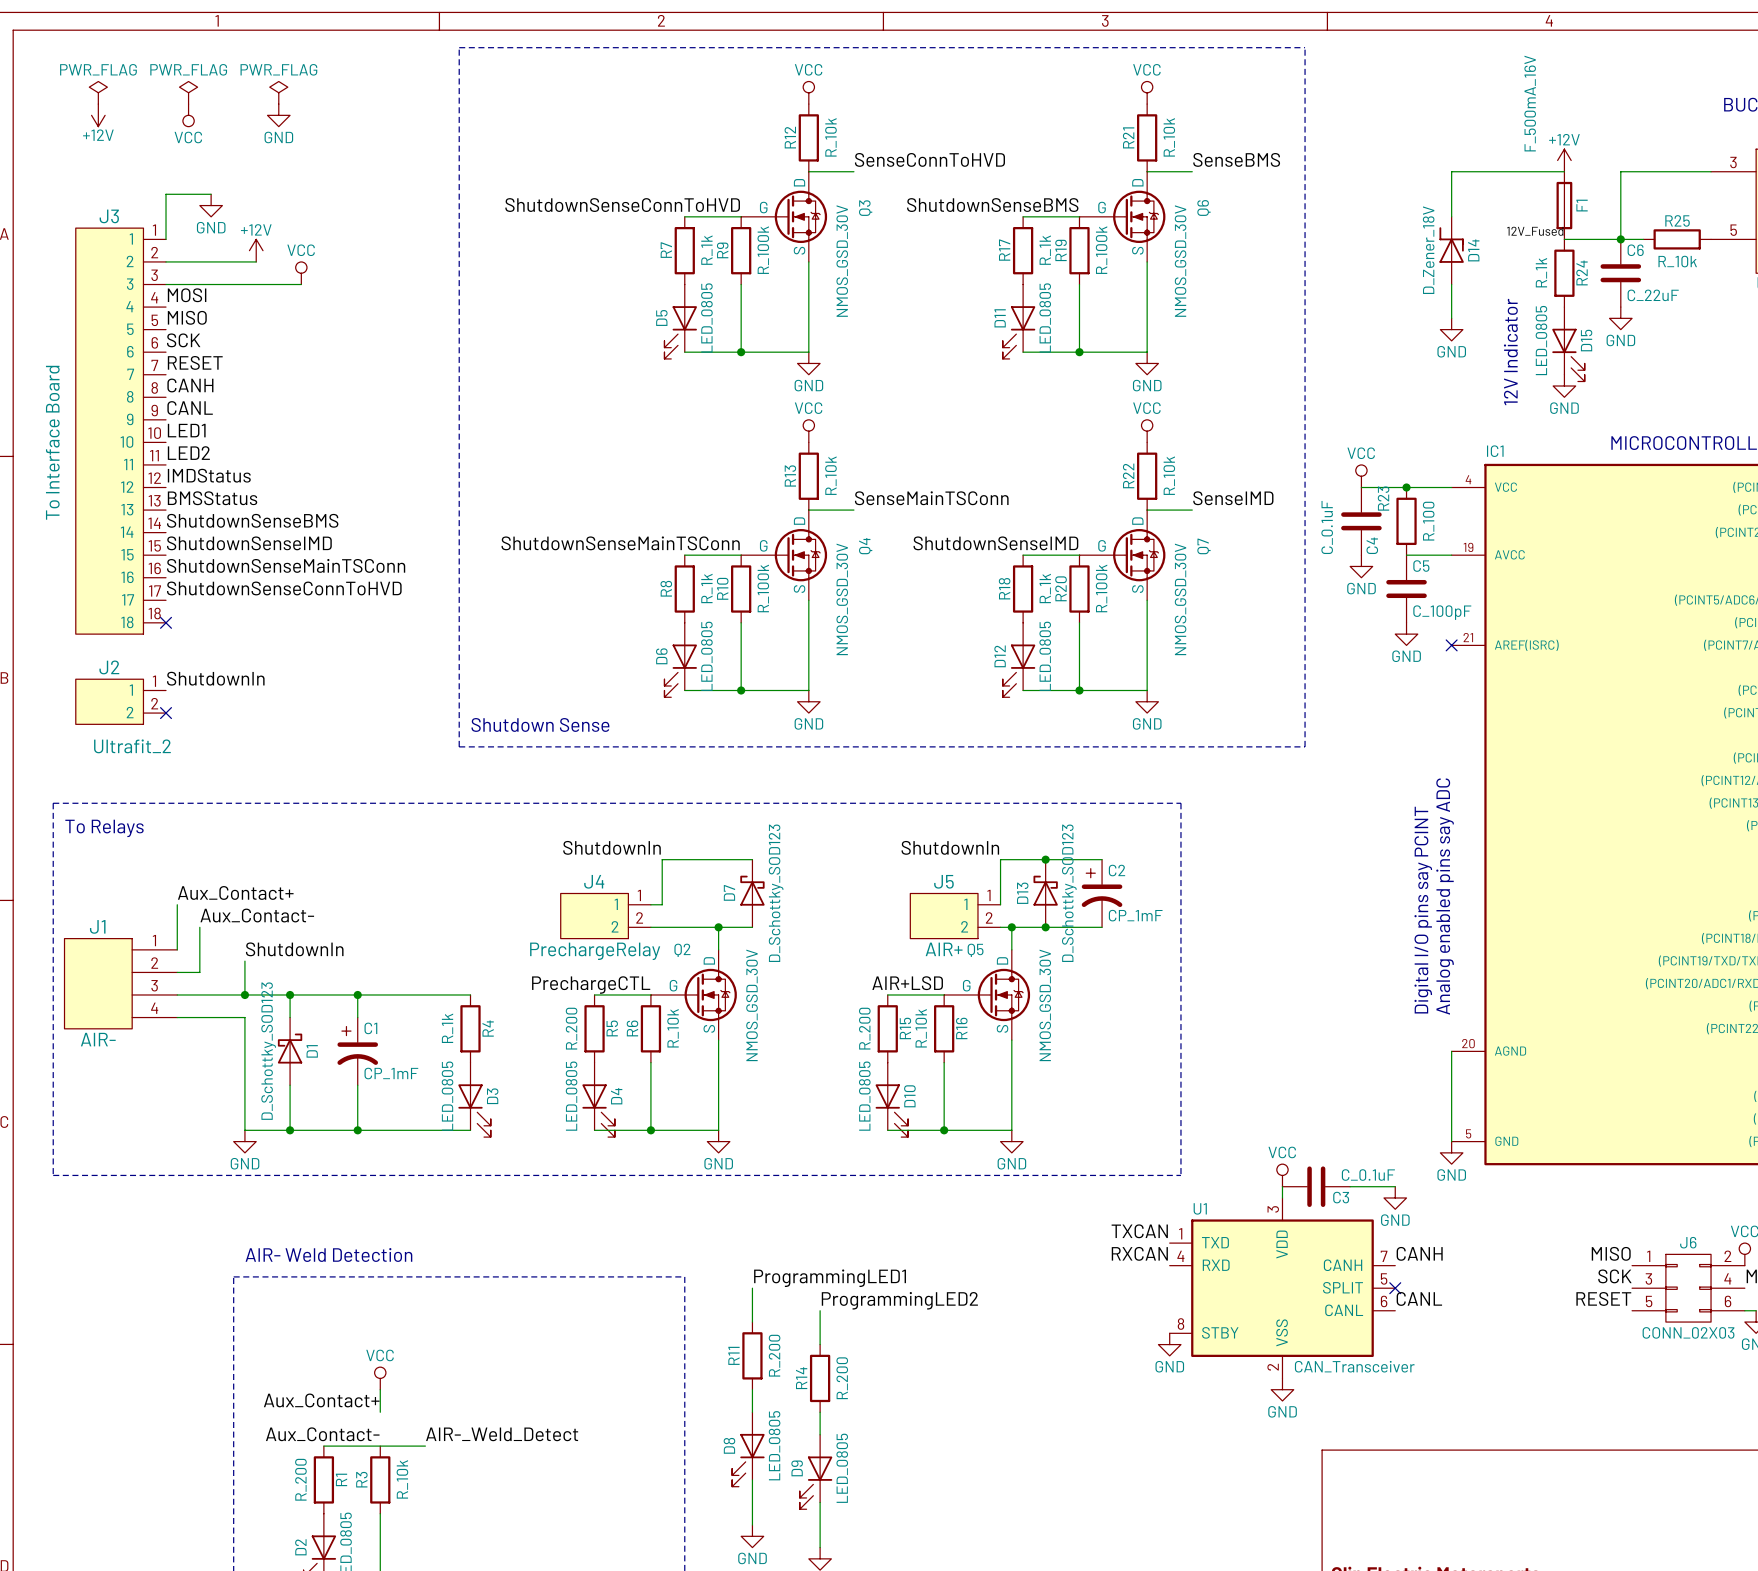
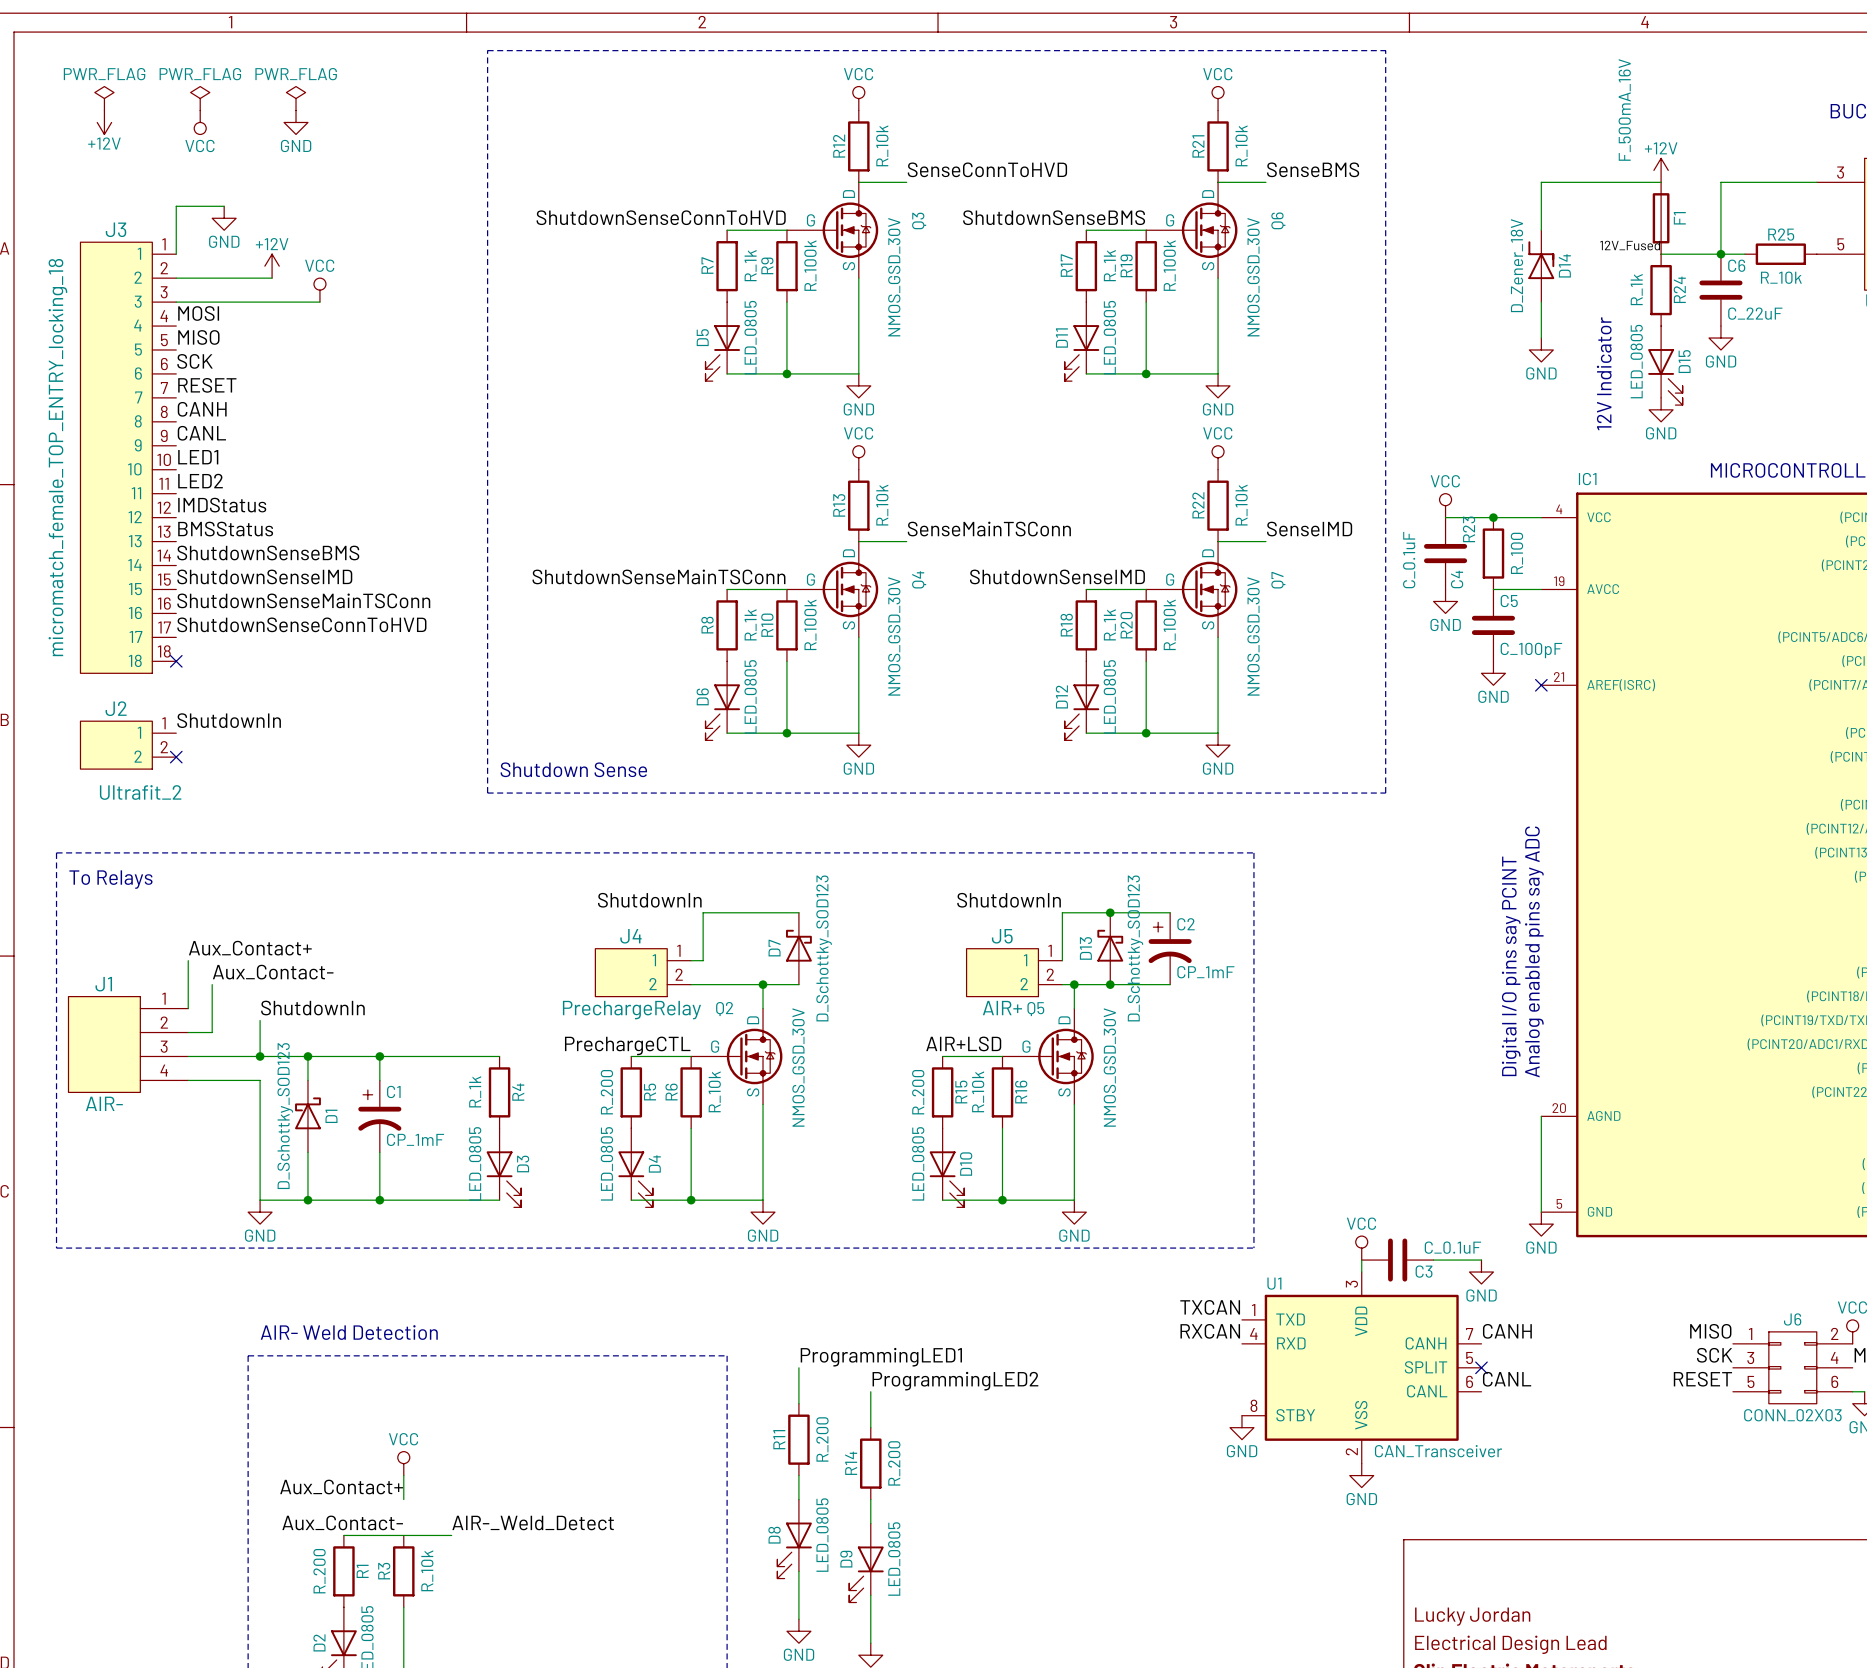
J3 value: To Interface Board (52, 442) -> micromatch_female_TOP_ENTRY_locking_18 (57, 457)
title block: none -> Lucky Jordan (1472, 1616)
title block: none -> Electrical Design Lead (1510, 1644)

